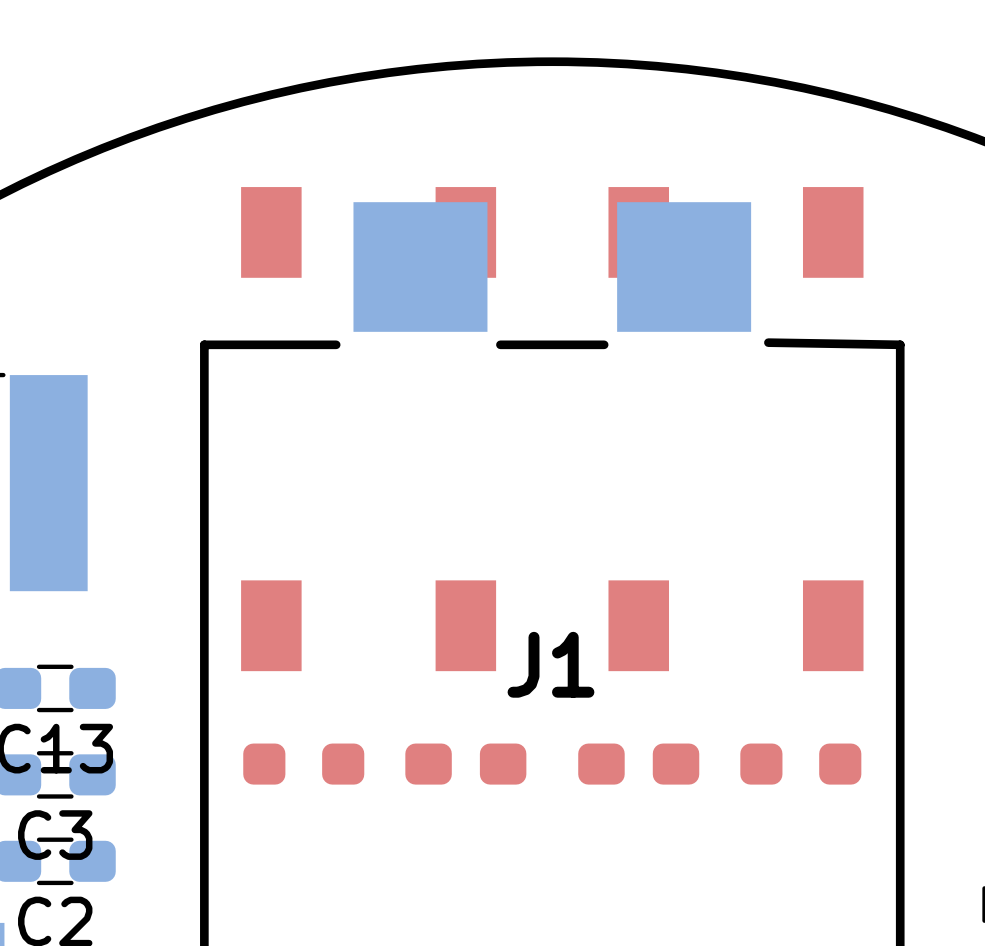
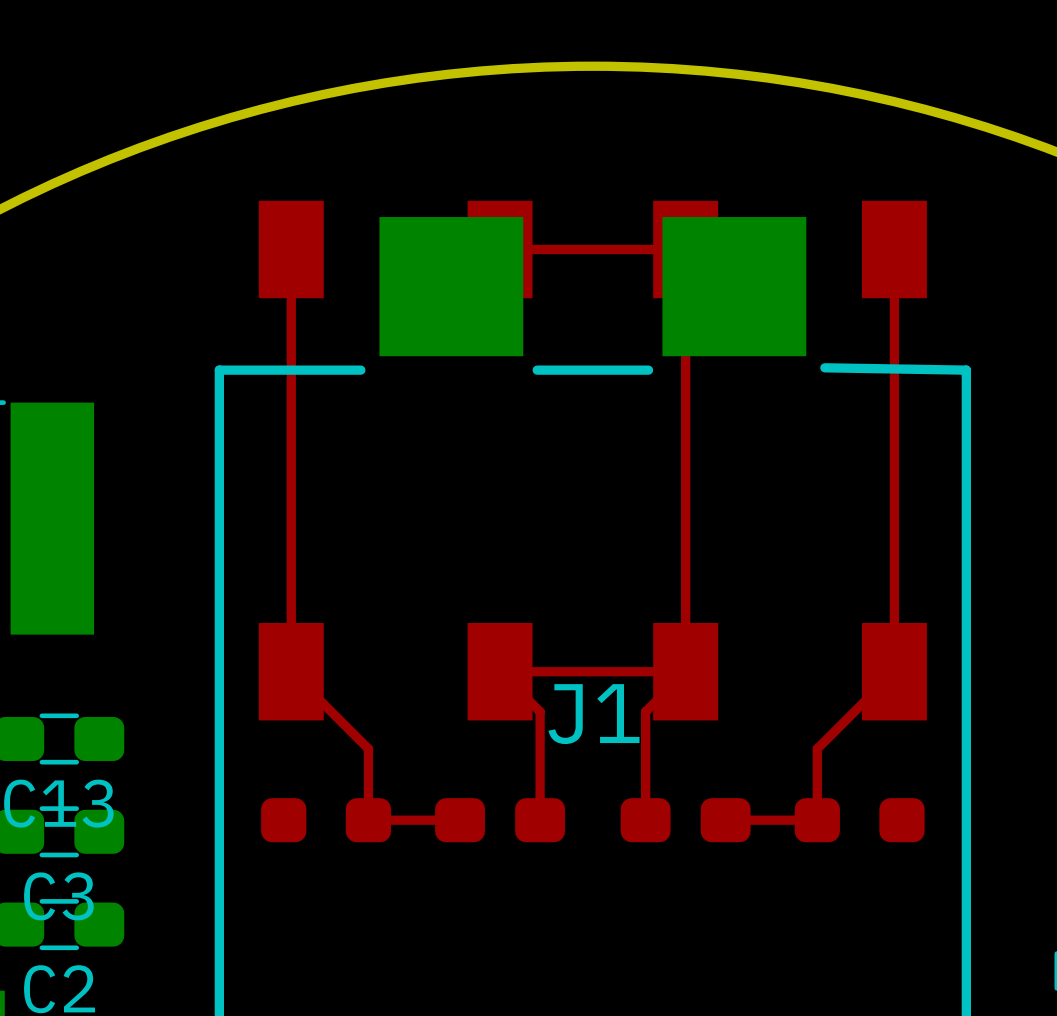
top track: none -> (291, 249) (291, 671) (368, 748) (368, 820) (460, 820)
top track: none -> (500, 249) (685, 249) (685, 671)
top track: none -> (894, 249) (894, 671) (817, 748) (817, 820) (725, 820)
top track: none -> (685, 671) (500, 671) (540, 711) (540, 820)
top track: none -> (685, 671) (645, 711) (645, 820)

